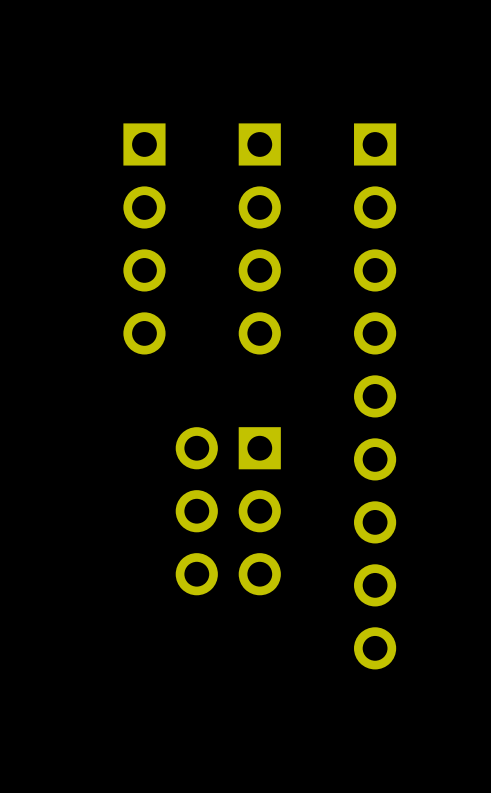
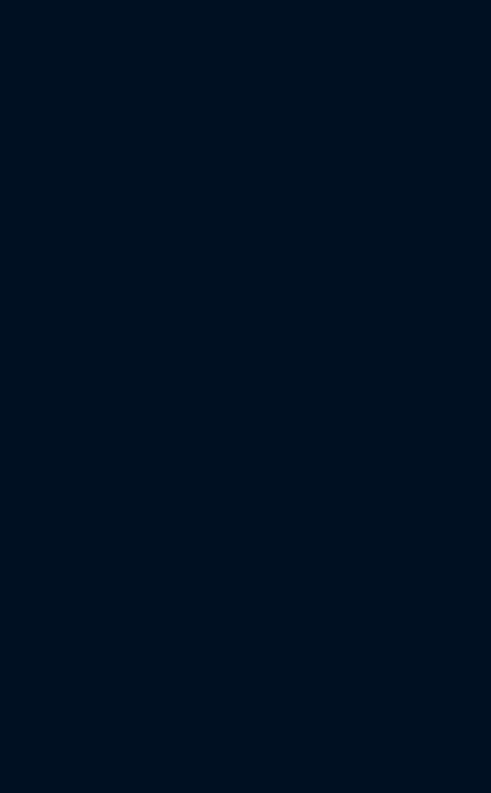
part: (144, 238) -> none
part: (259, 238) -> none
part: (375, 396) -> none
part: (228, 511) -> none

